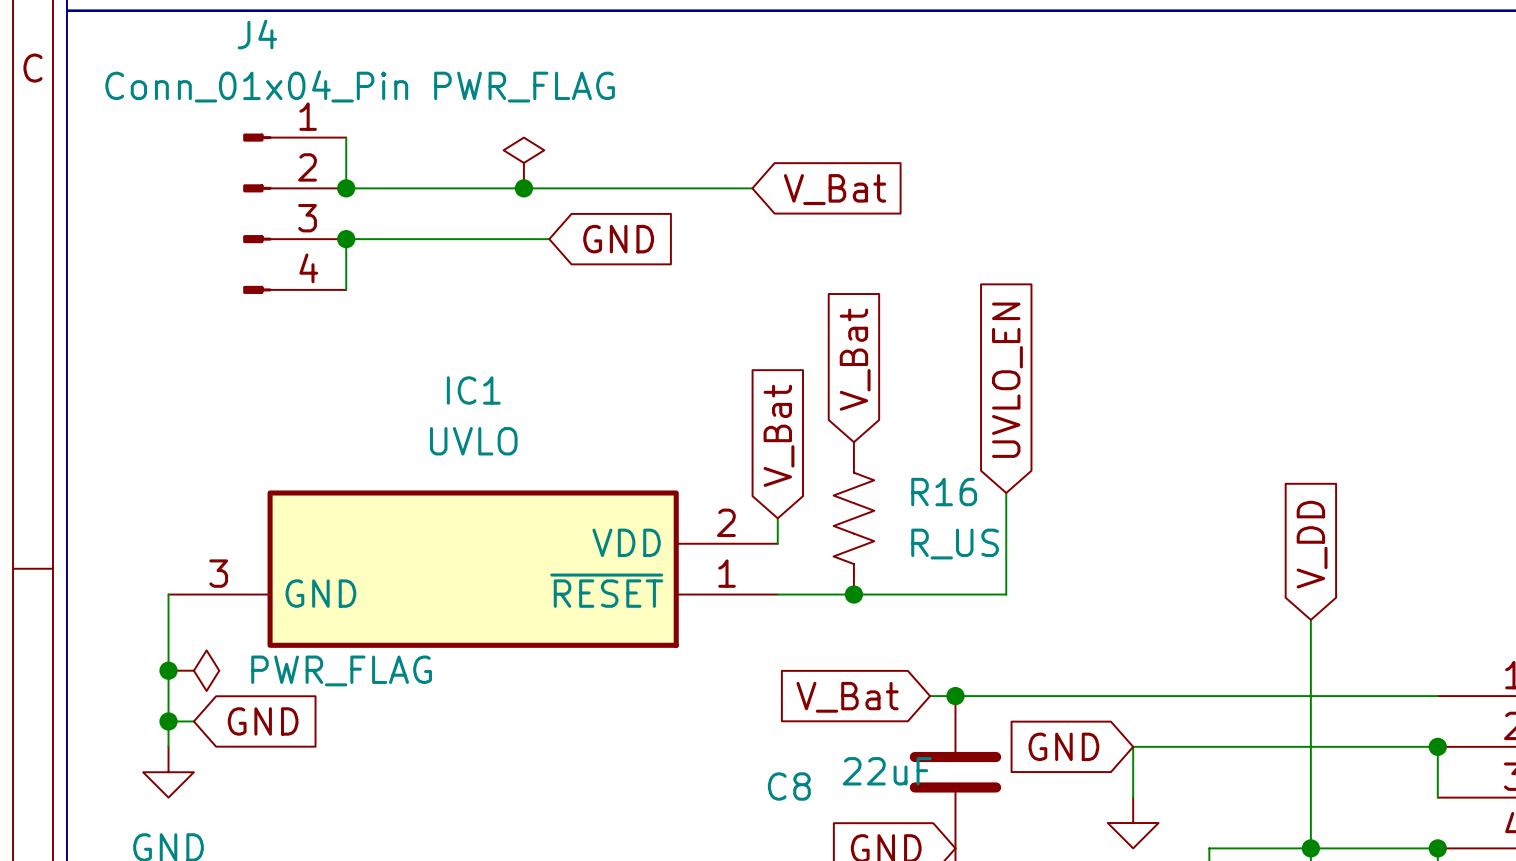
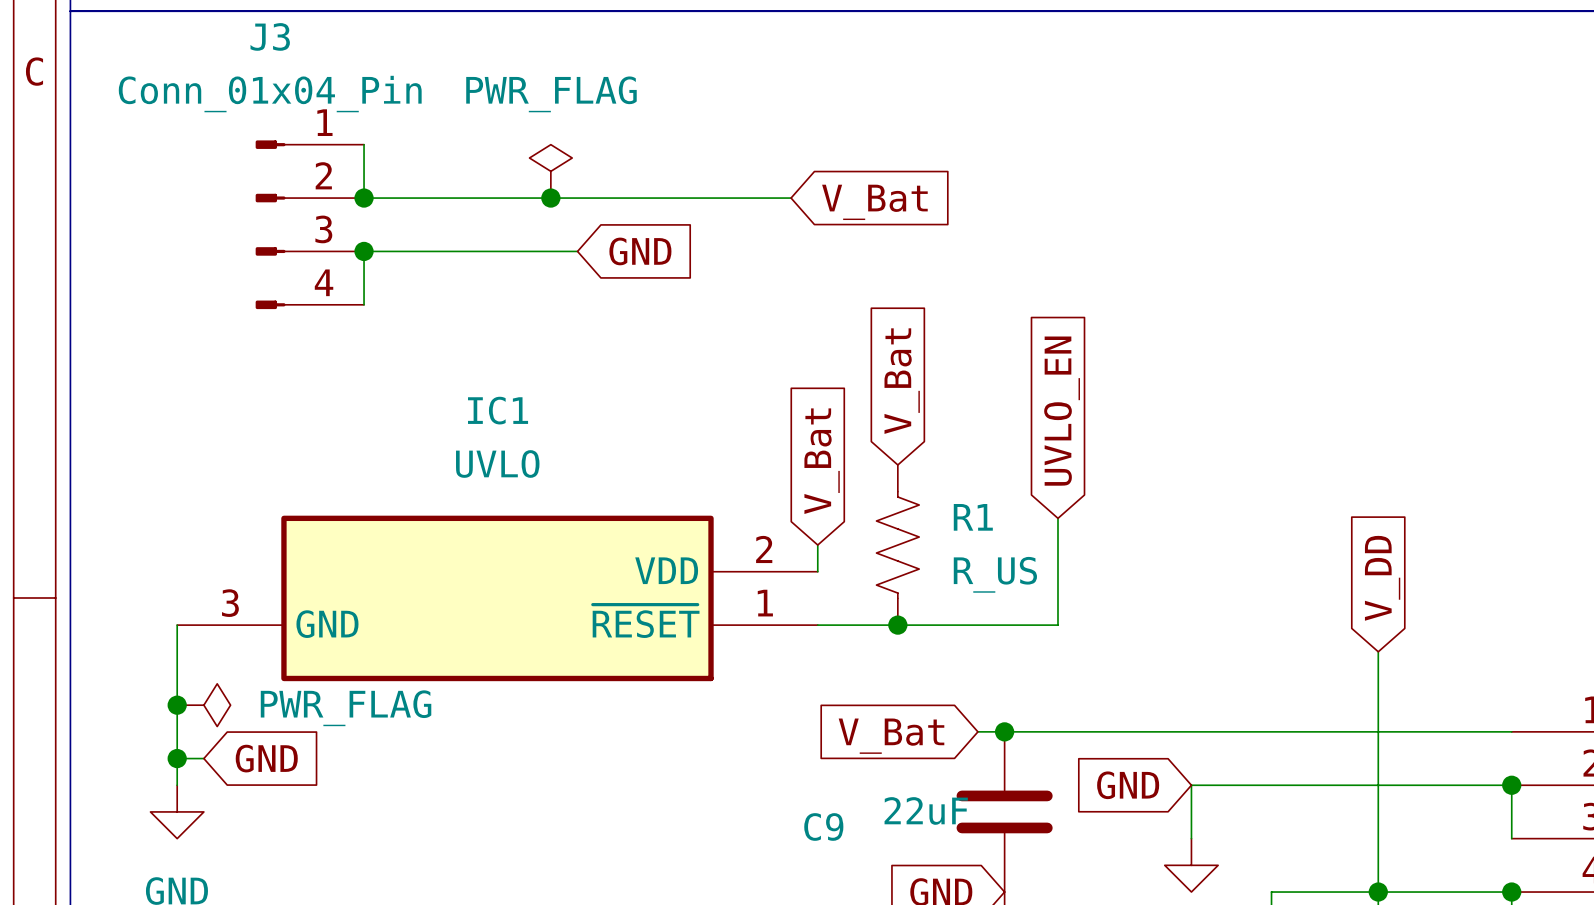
J4 name: J4 (257, 34) -> J3 (270, 36)
R16 name: R16 (944, 492) -> R1 (973, 517)
C8 name: C8 (789, 786) -> C9 (823, 826)

